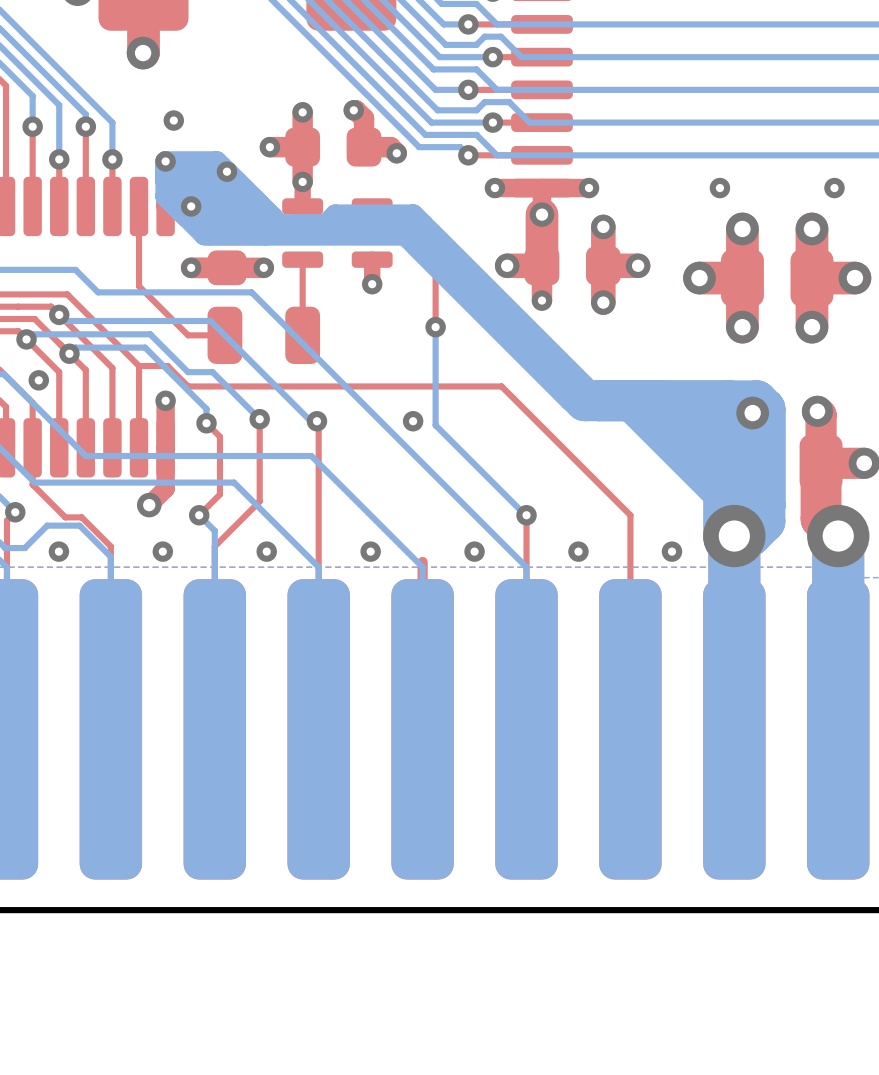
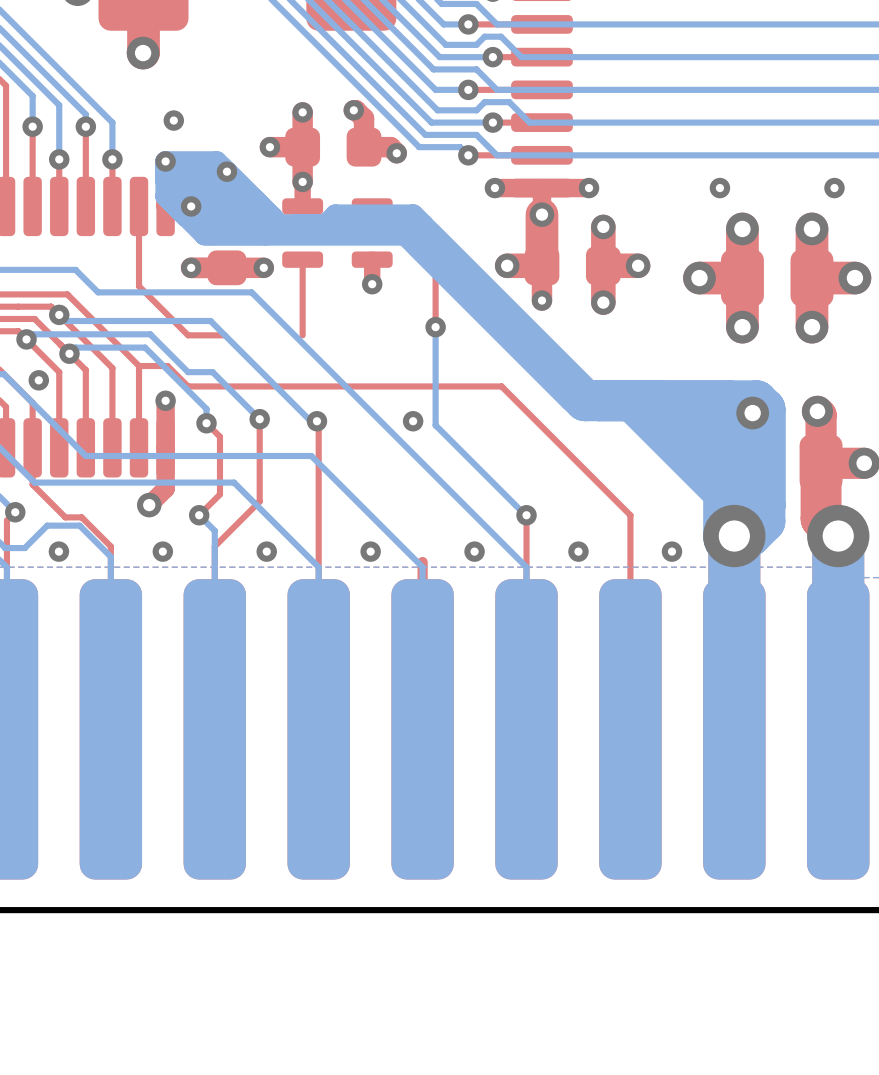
part: (263, 335) -> none

